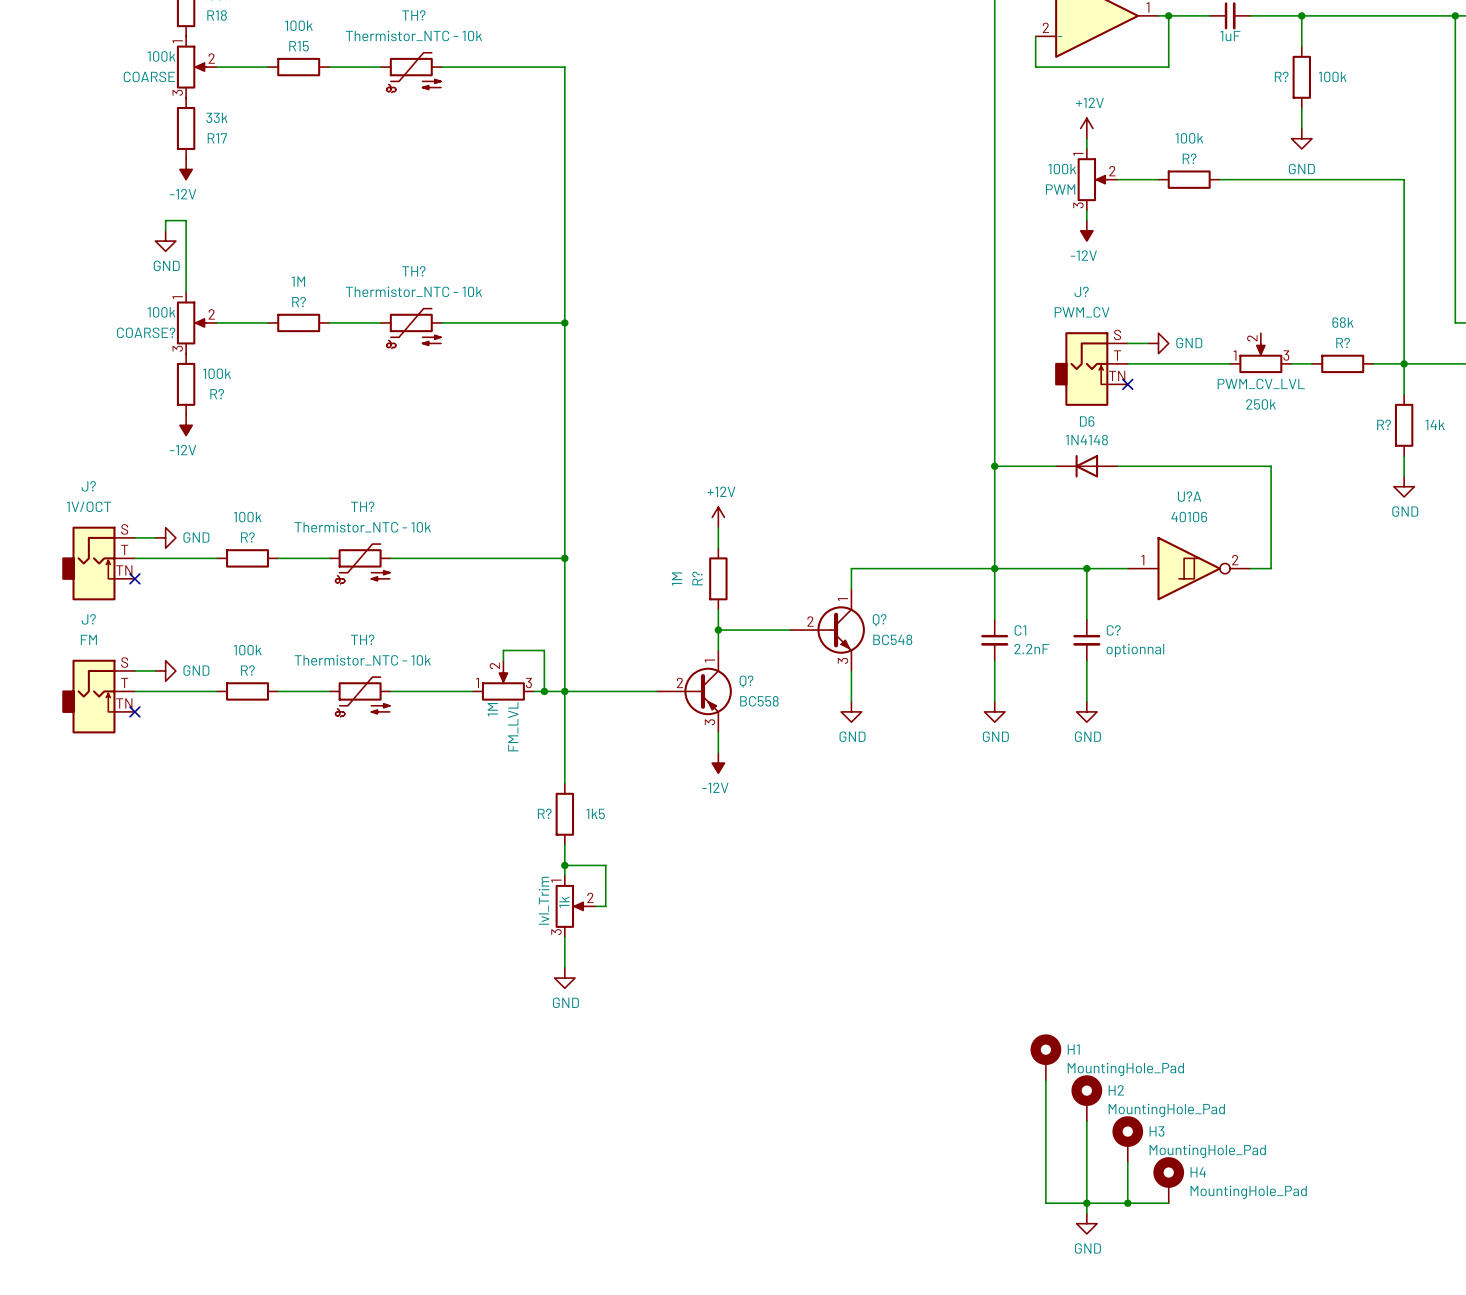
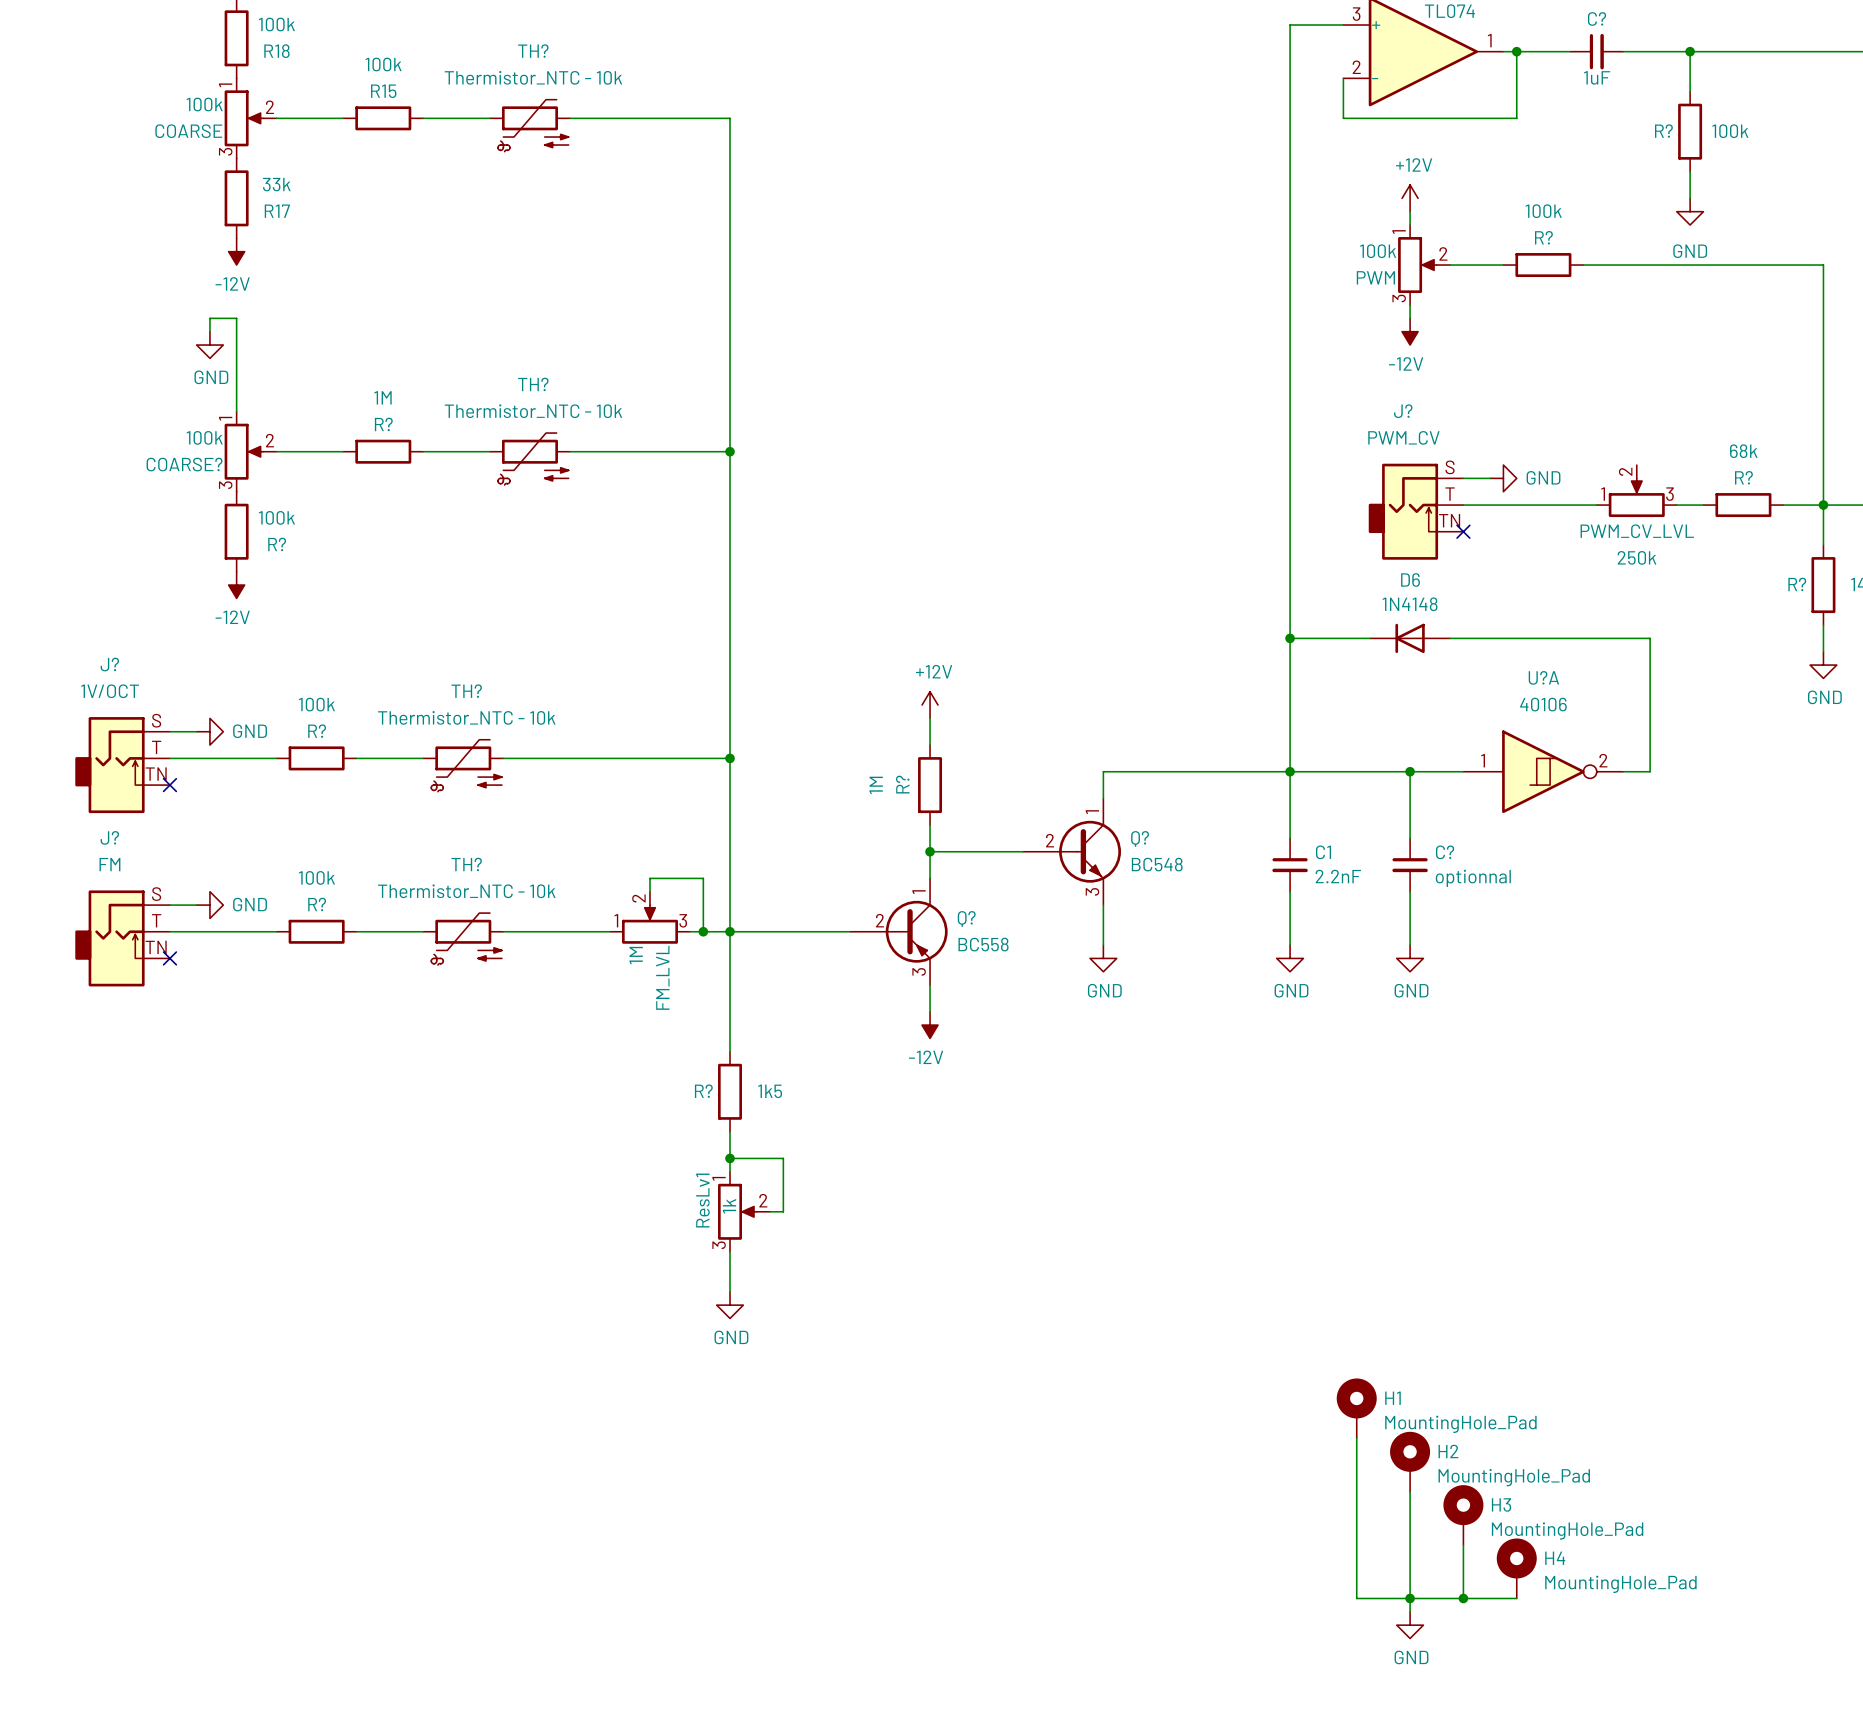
lvl_Trim name: lvl_Trim (543, 900) -> ResLv1 (702, 1200)

